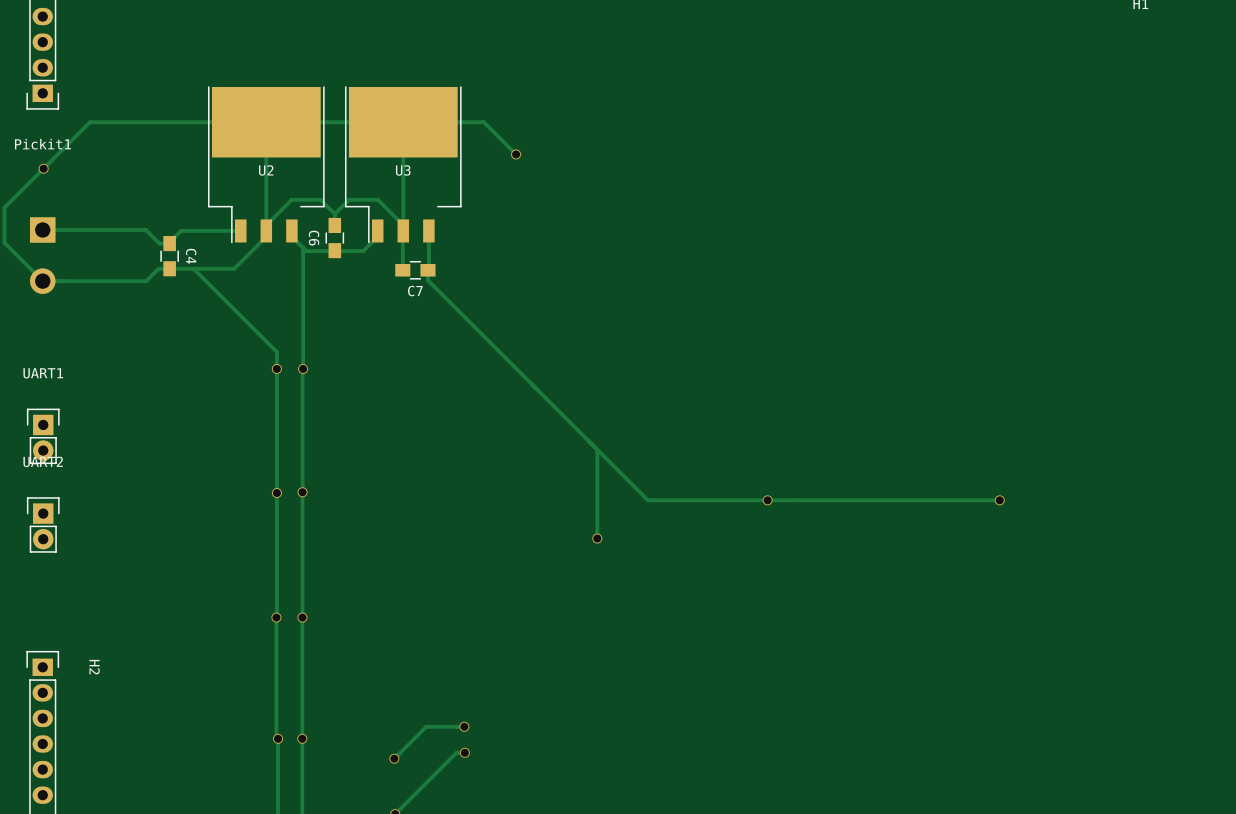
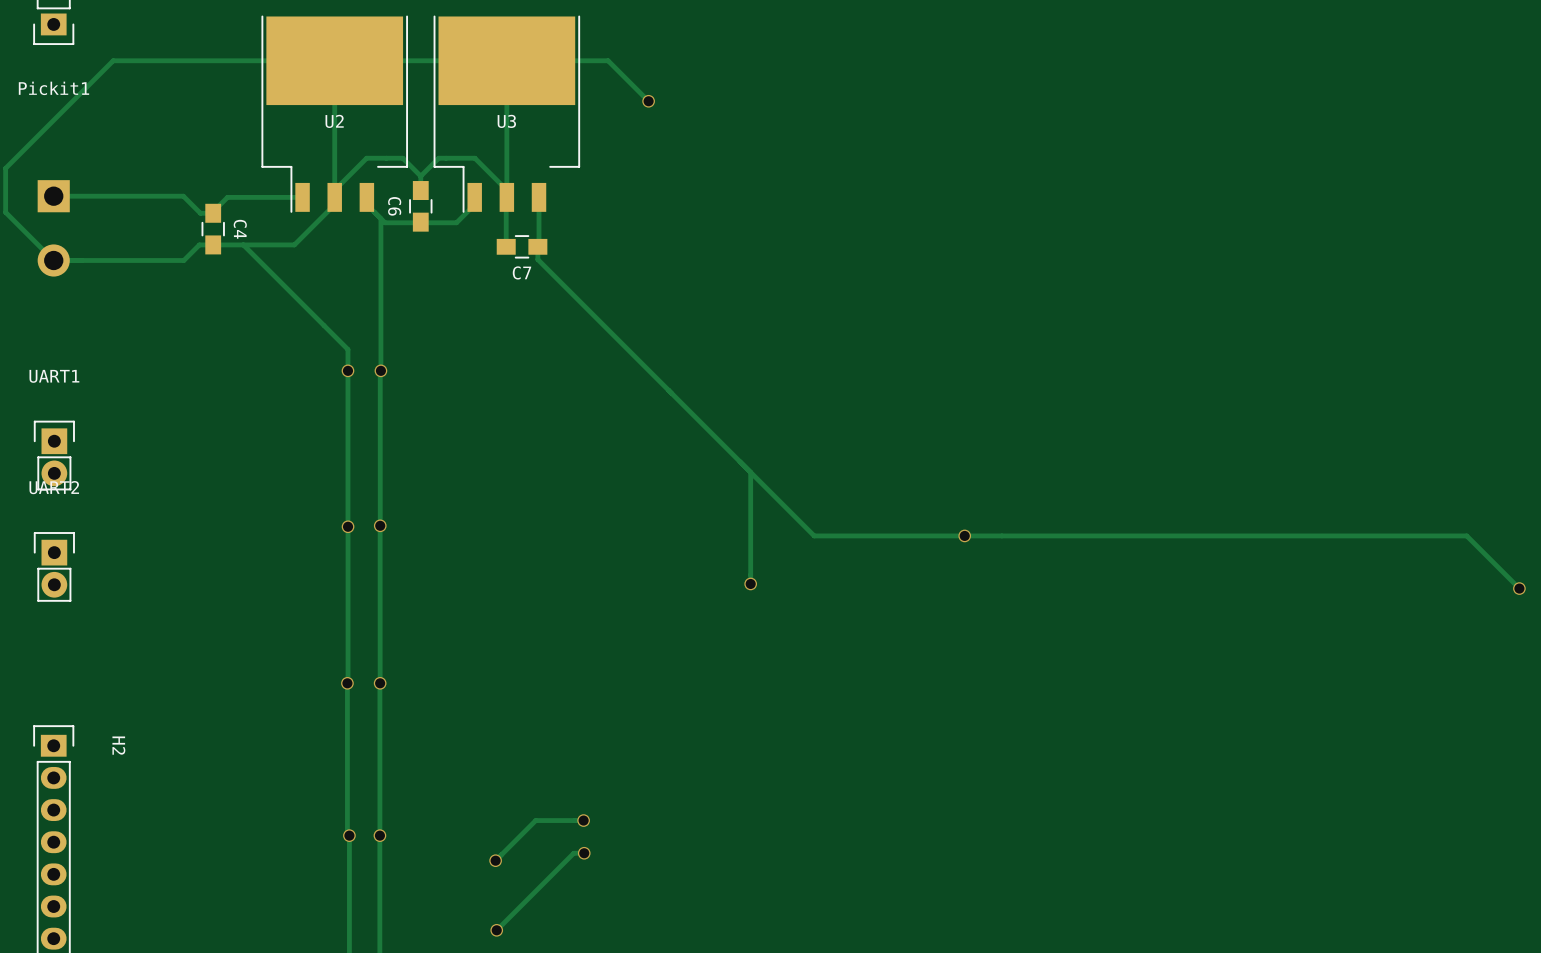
via: (43, 168) -> none
track: none -> (1256, 535) (1466, 535) (1519, 588)
via: (999, 500) -> none
via: none -> (1519, 588)

